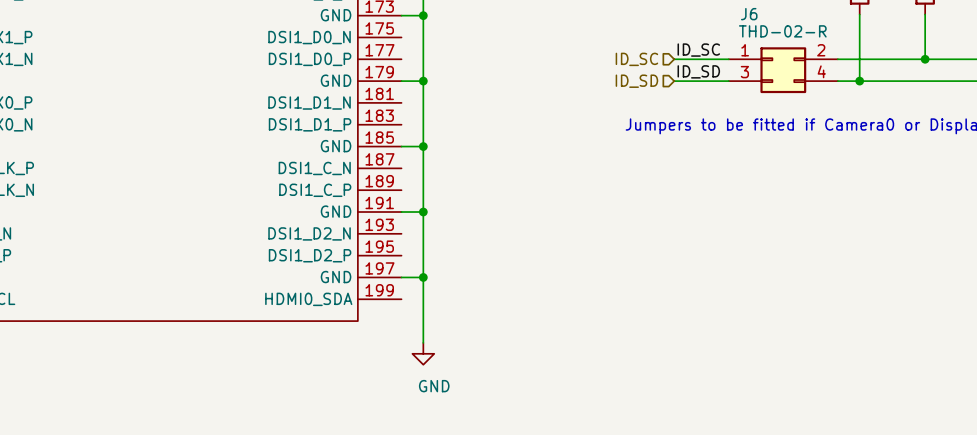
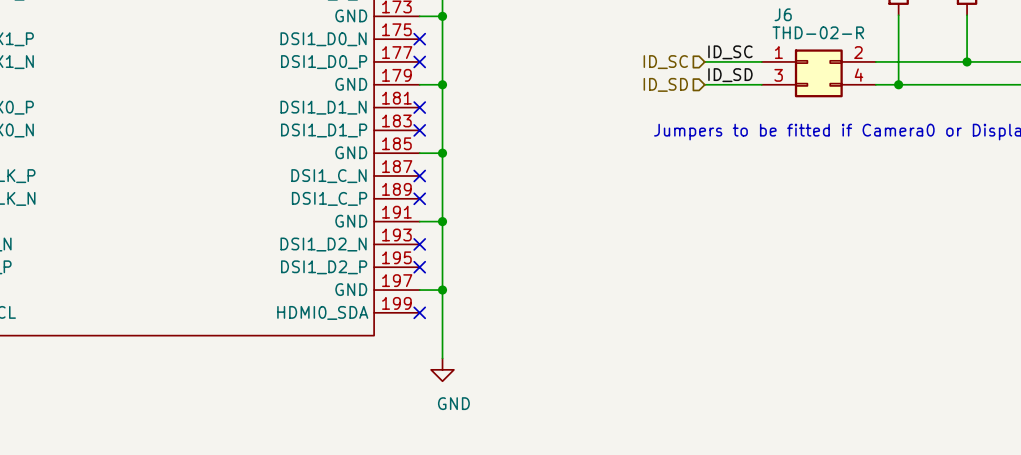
no-connect mark: none -> (419, 39)
no-connect mark: none -> (419, 61)
no-connect mark: none -> (419, 107)
no-connect mark: none -> (419, 130)
no-connect mark: none -> (419, 175)
no-connect mark: none -> (419, 198)
no-connect mark: none -> (419, 244)
no-connect mark: none -> (419, 267)
no-connect mark: none -> (419, 312)

